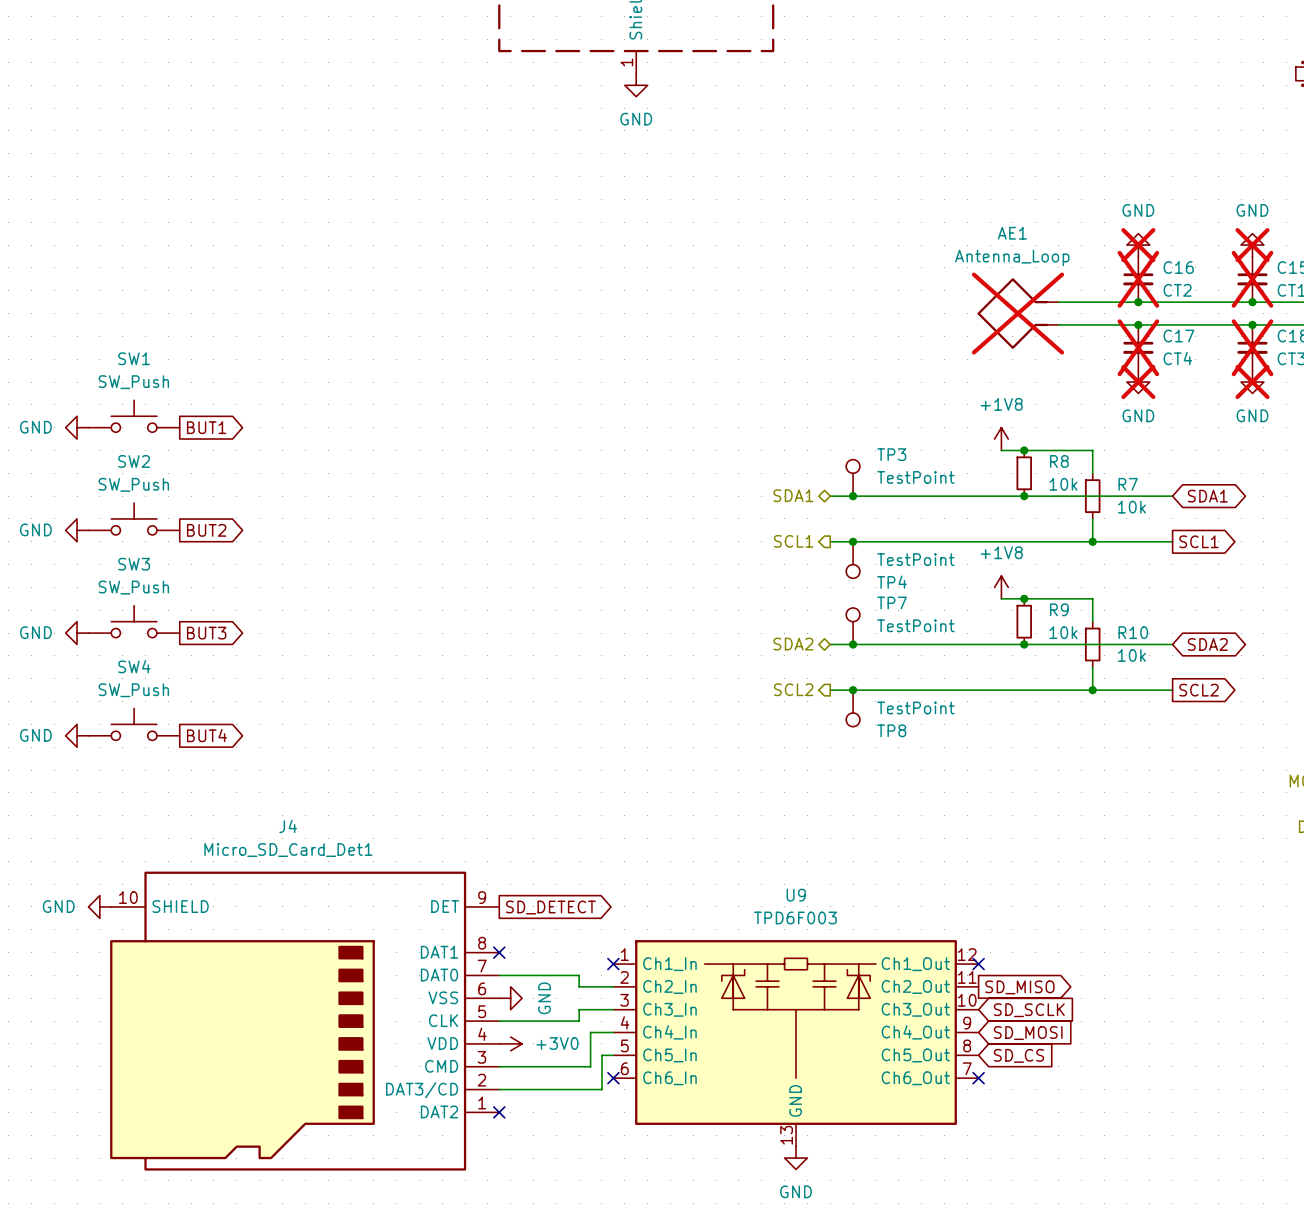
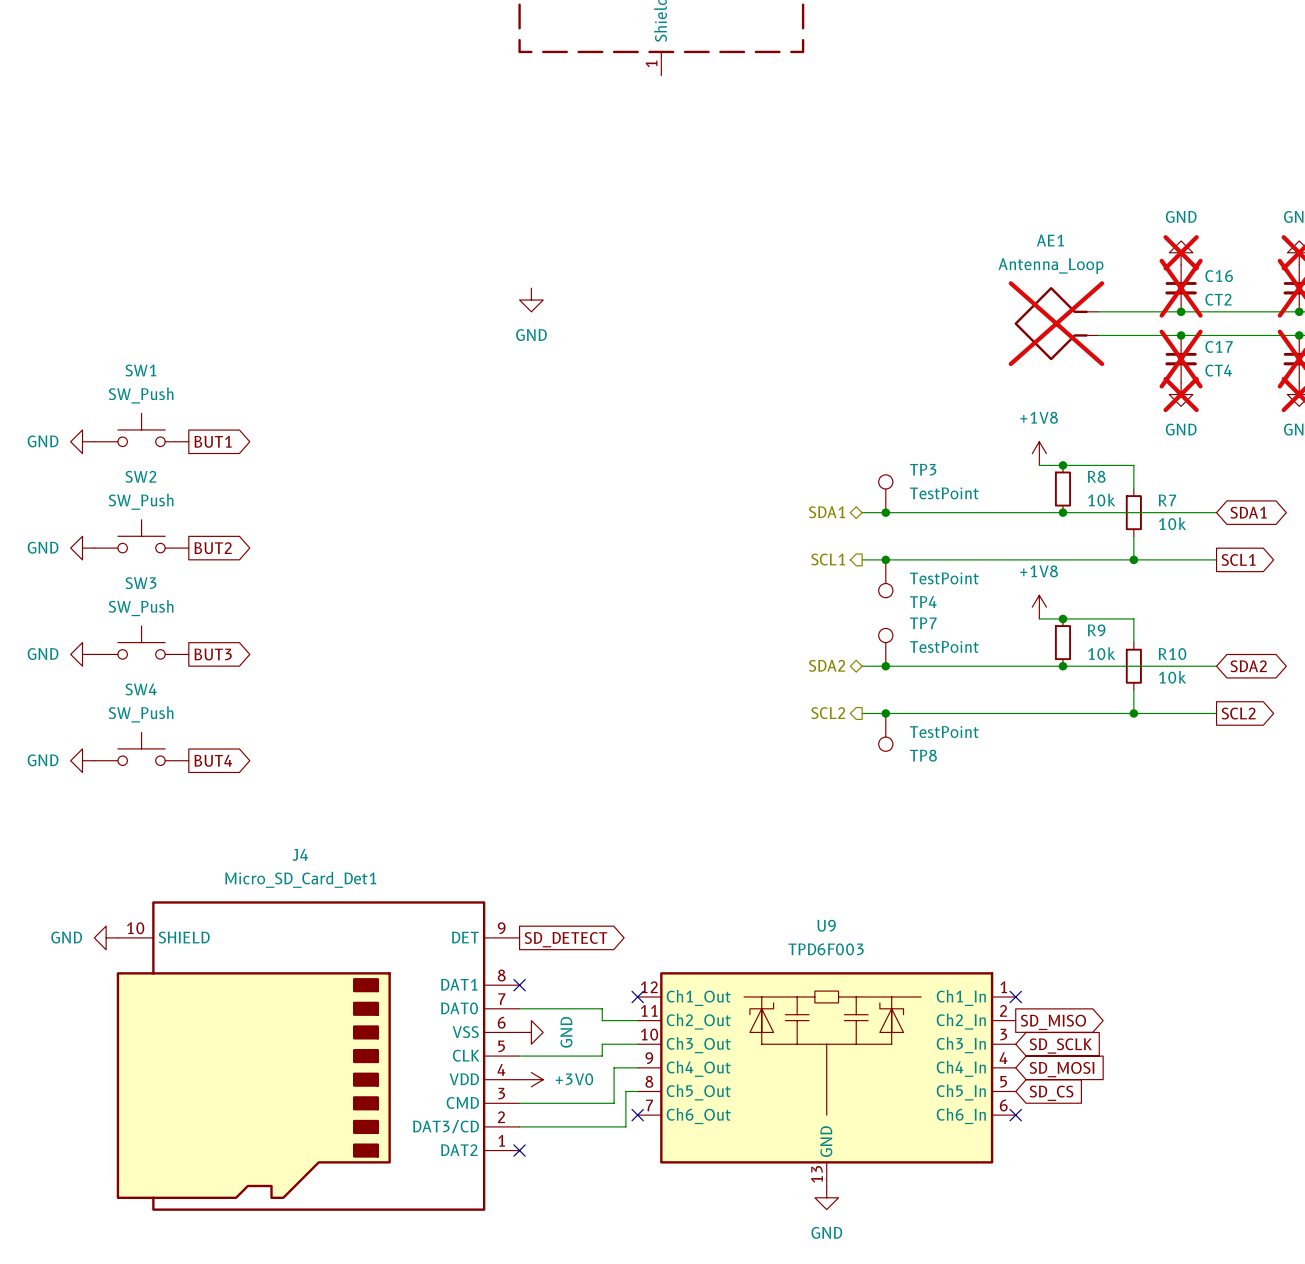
power symbol: GND (636, 85) -> none
power symbol: none -> GND (531, 300)
U9 flip: as is (796, 1032) -> left-right (826, 1067)

